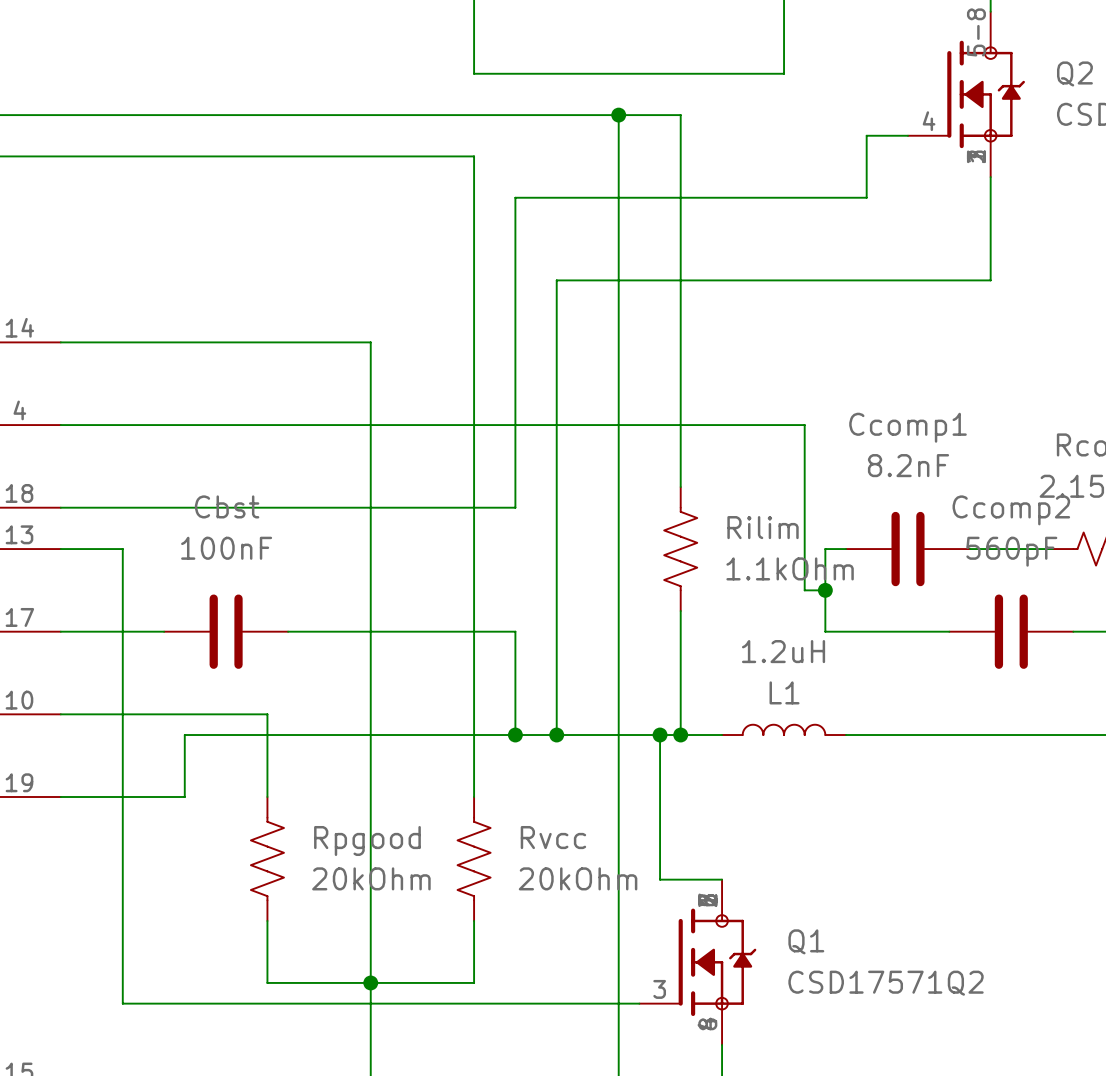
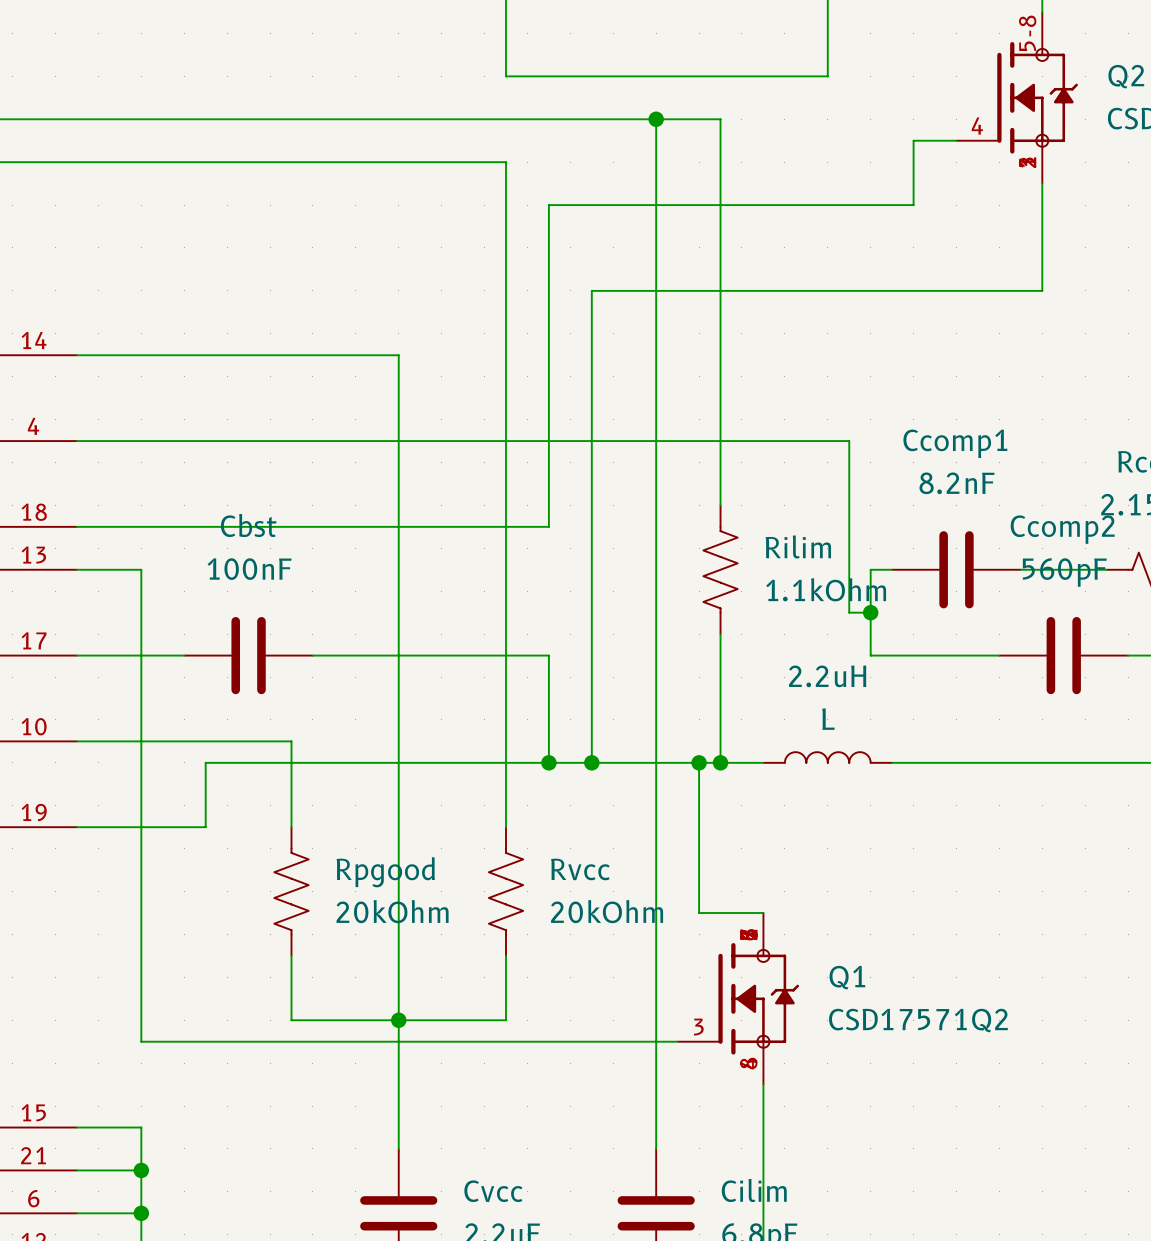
1.2uH name: 1.2uH (783, 651) -> 2.2uH (827, 676)
1.2uH value: L1 (784, 692) -> L (828, 719)

